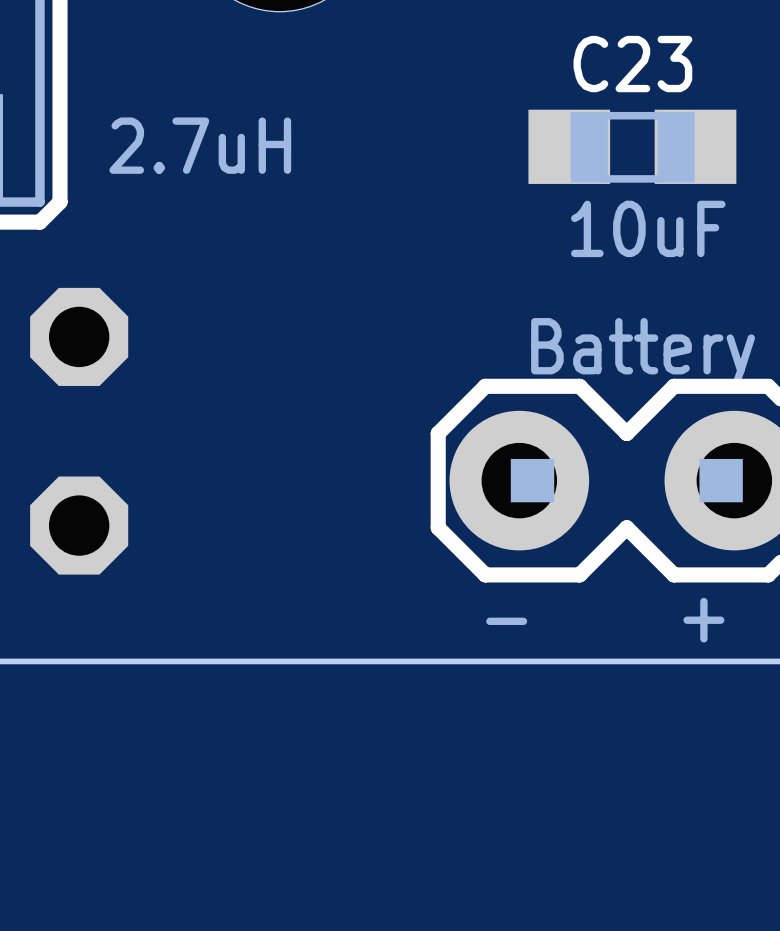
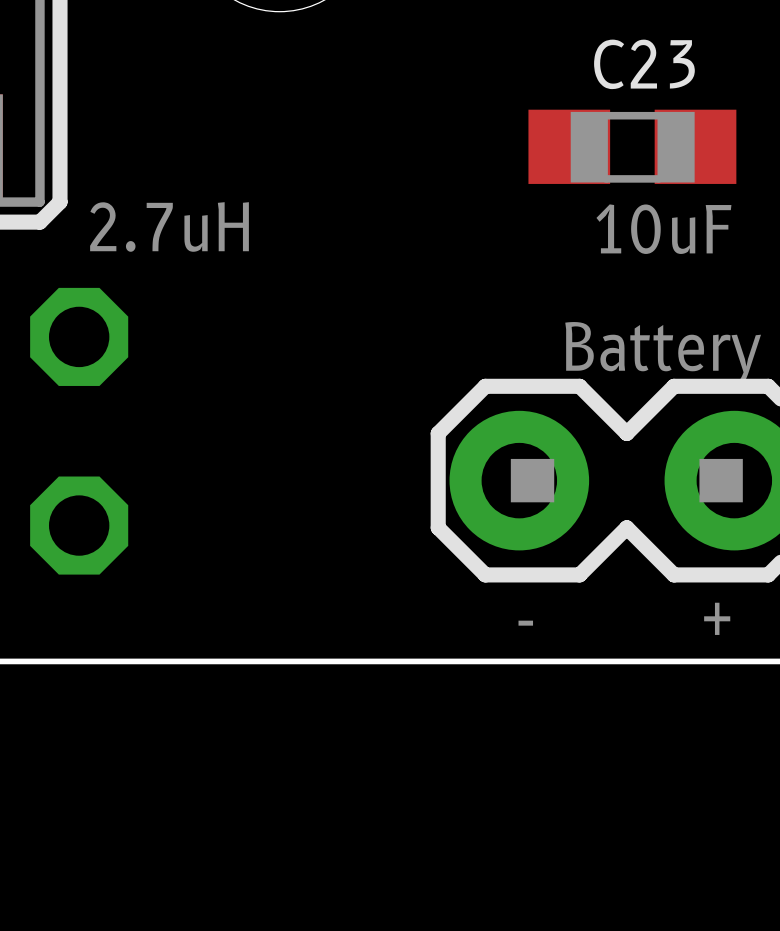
part value position: 2.7uH (200, 145) -> 2.7uH (169, 226)

